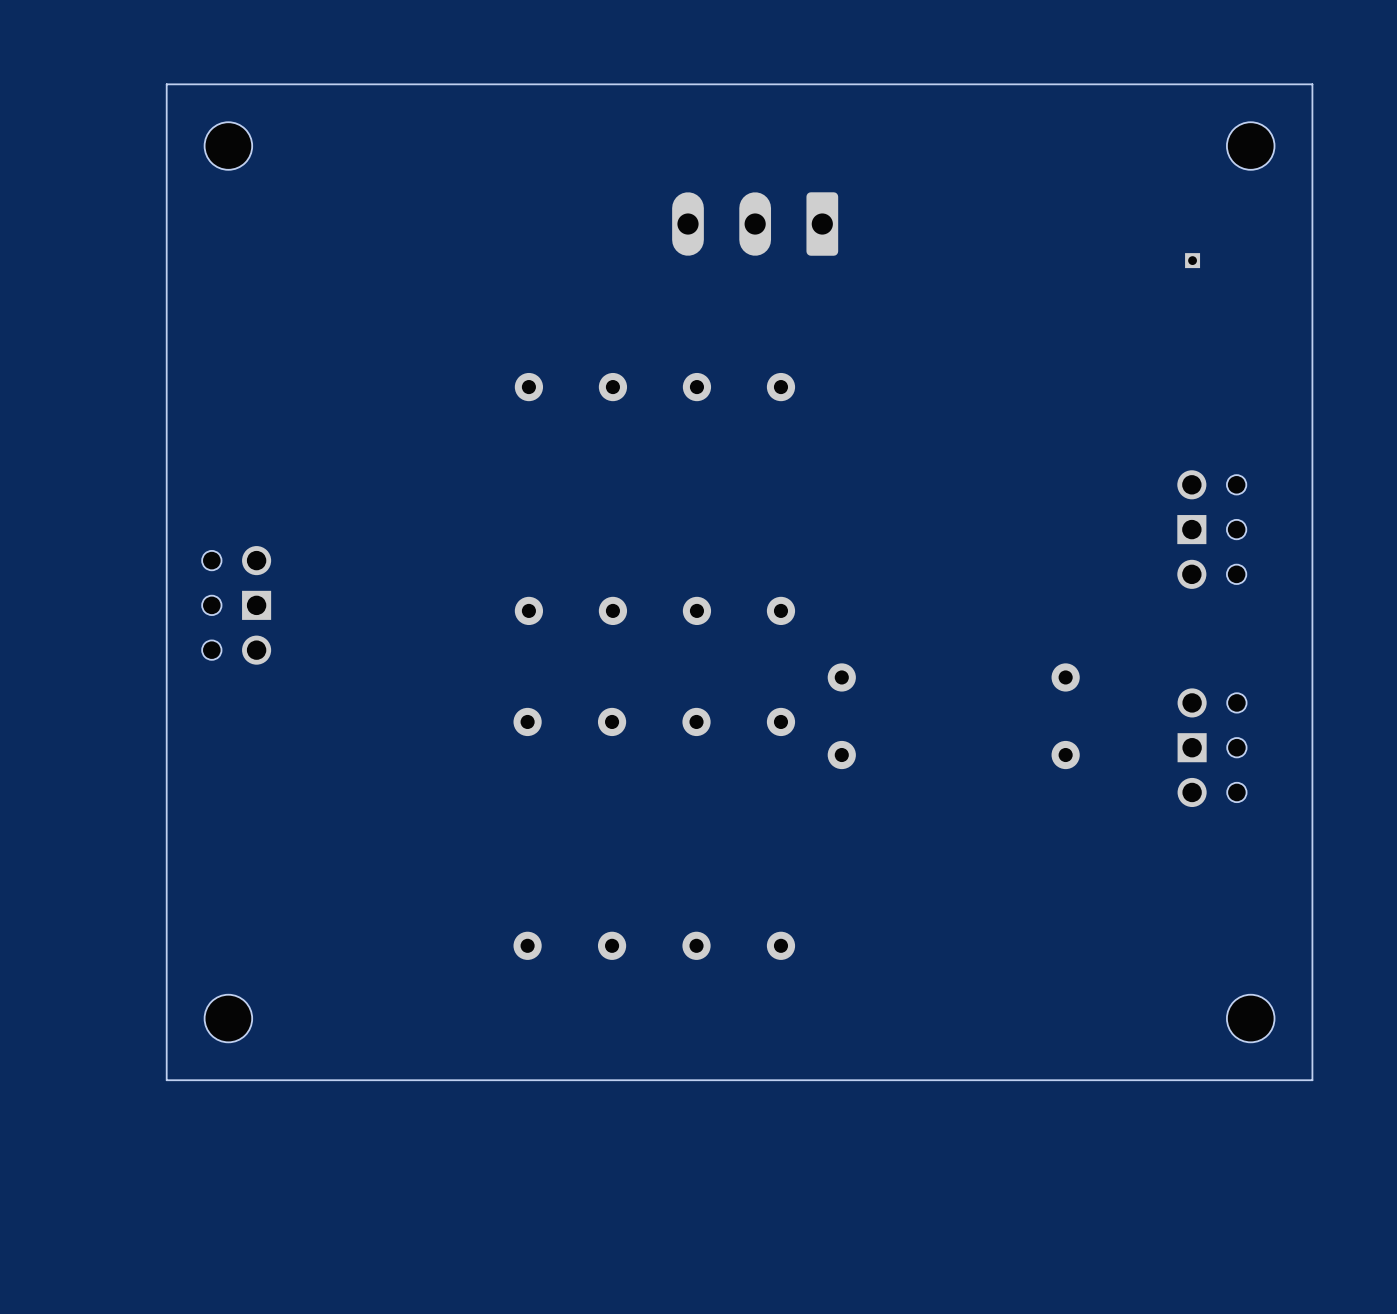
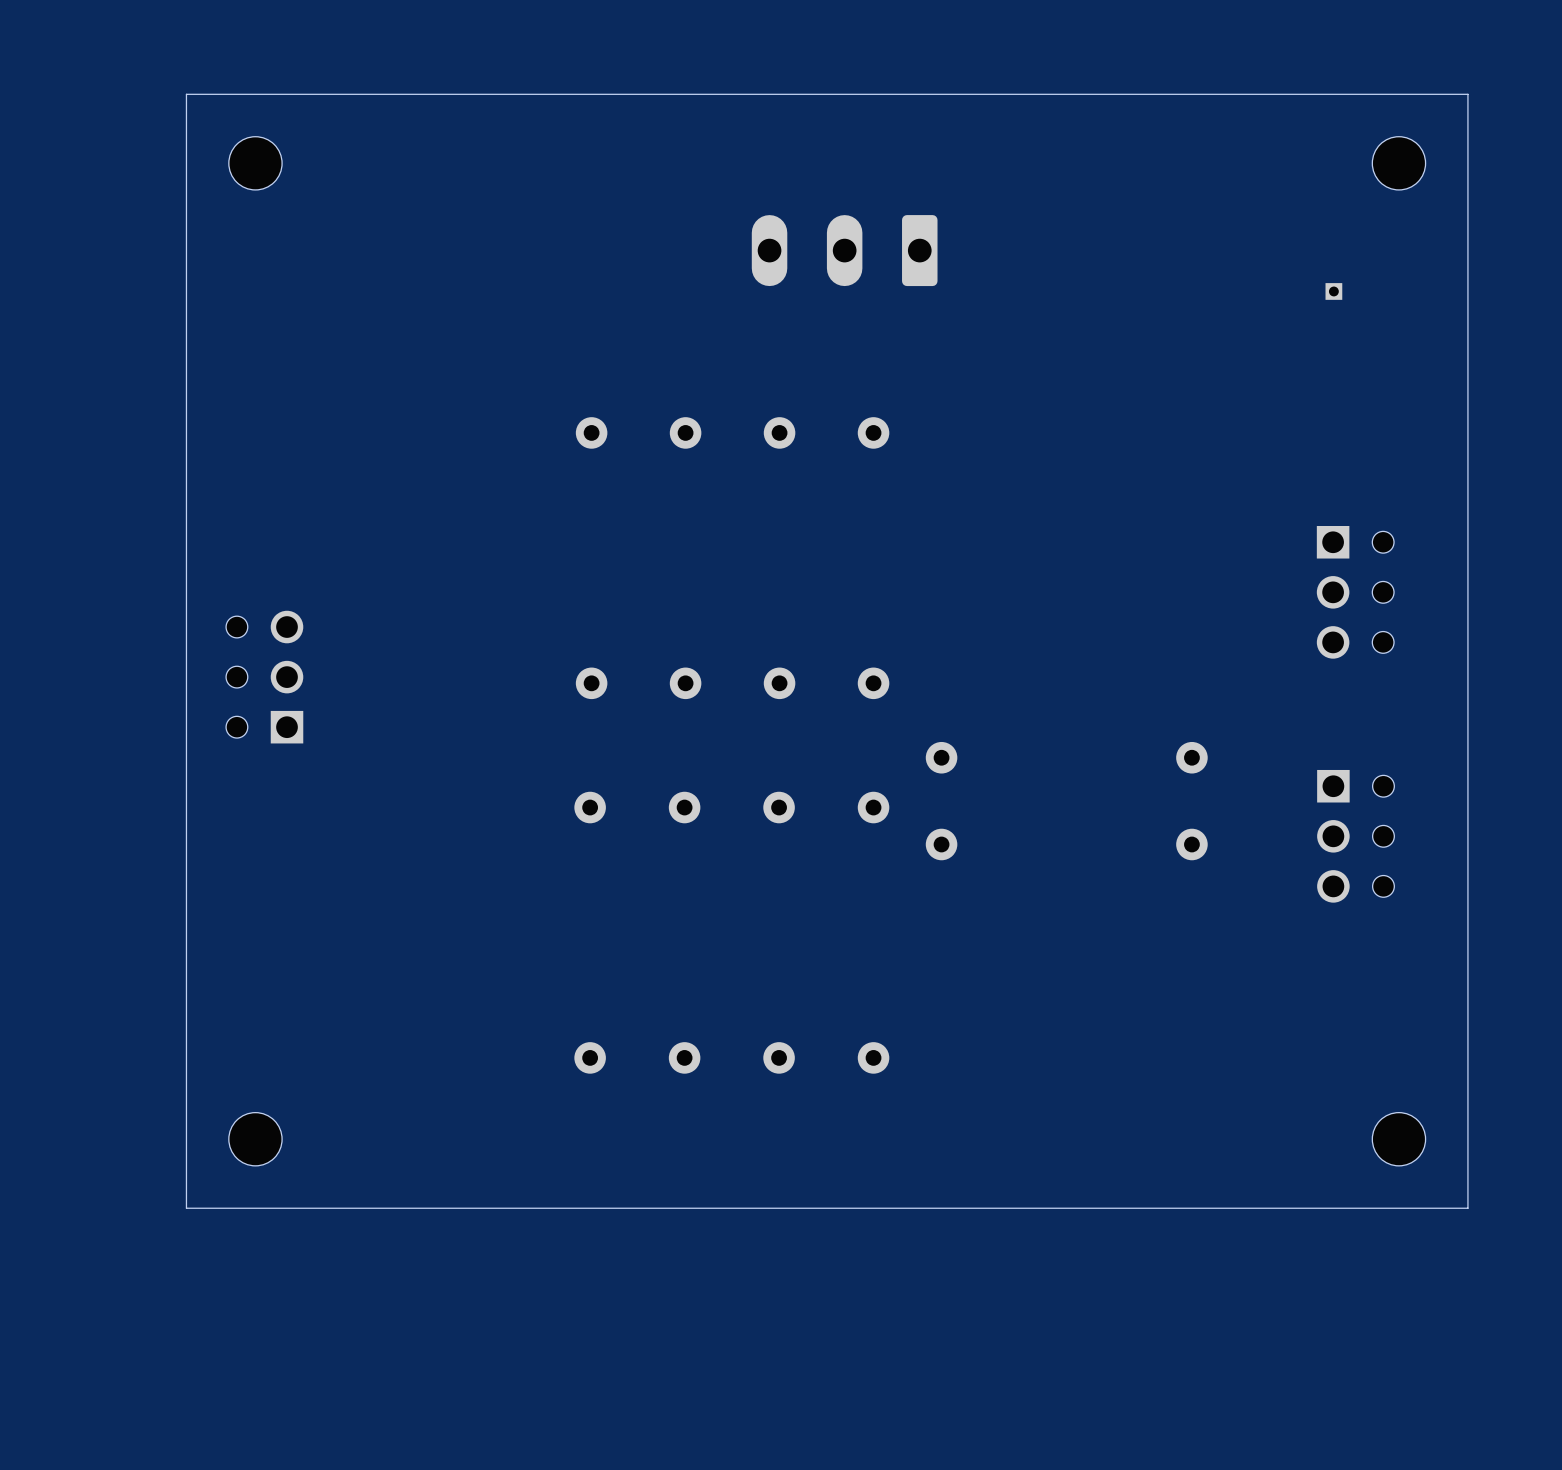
part footprint: [1177, 470, 1247, 589] -> [1316, 525, 1395, 659]
part footprint: [202, 546, 272, 665] -> [226, 610, 304, 744]
part footprint: [1177, 688, 1247, 808] -> [1317, 769, 1395, 903]

